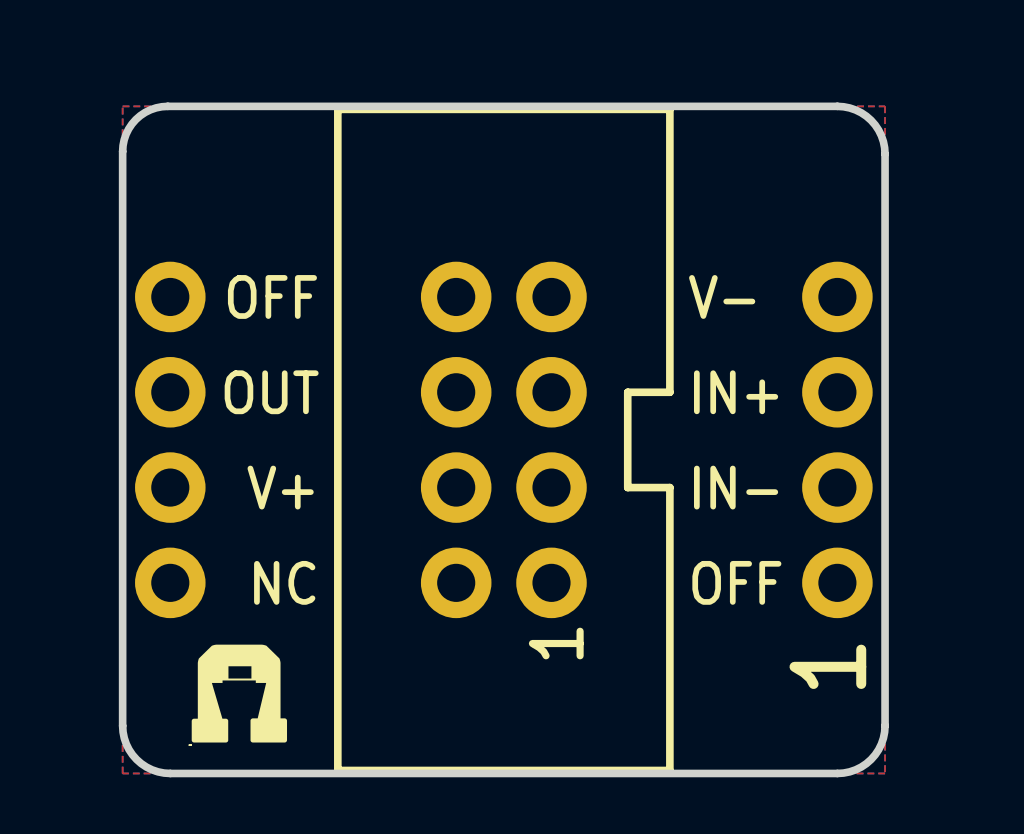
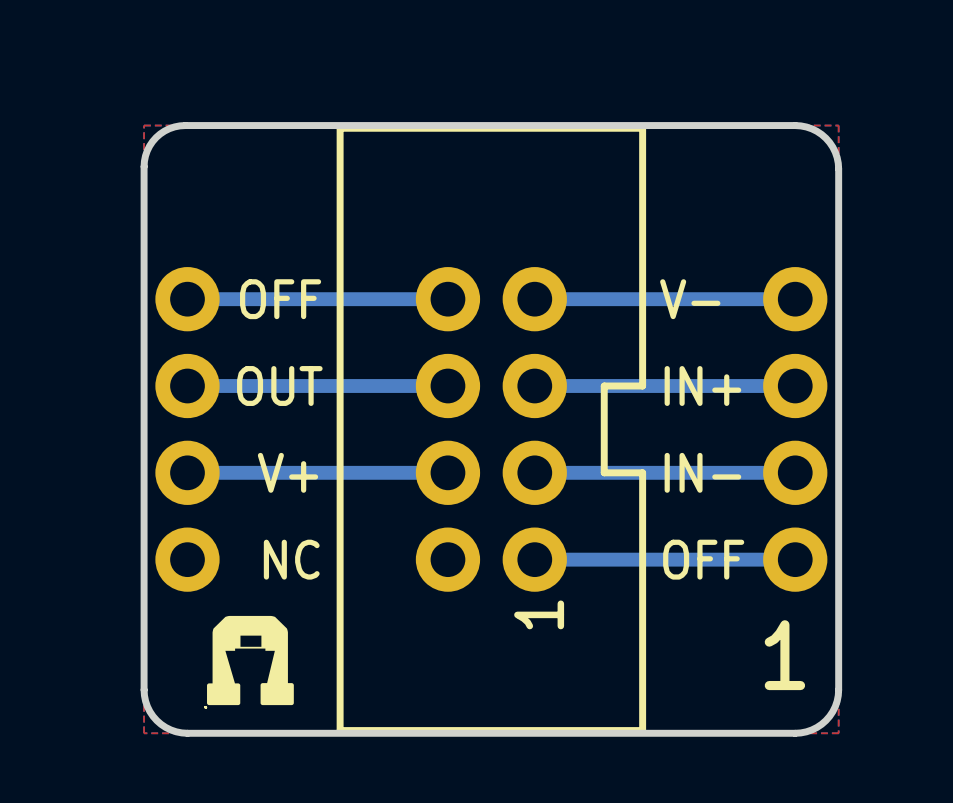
bottom track: none -> (187, 299) (447, 299)
bottom track: none -> (534, 299) (795, 299)
bottom track: none -> (187, 386) (447, 386)
bottom track: none -> (534, 386) (795, 386)
bottom track: none -> (187, 472) (447, 472)
bottom track: none -> (534, 472) (795, 472)
bottom track: none -> (534, 559) (795, 559)
text rotation: 0° (827, 666) -> 90° clockwise (784, 655)

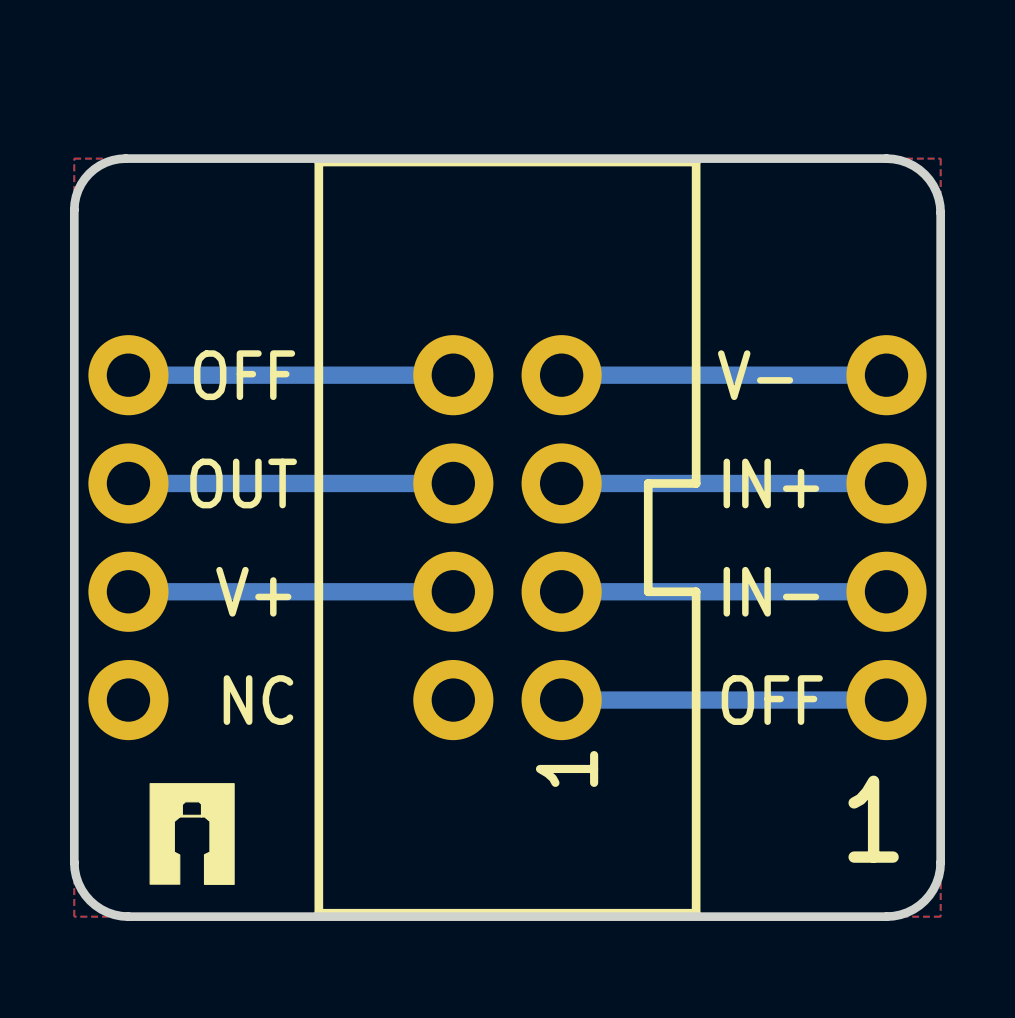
drawing shape: [204, 615, 294, 708] -> [149, 783, 235, 885]

